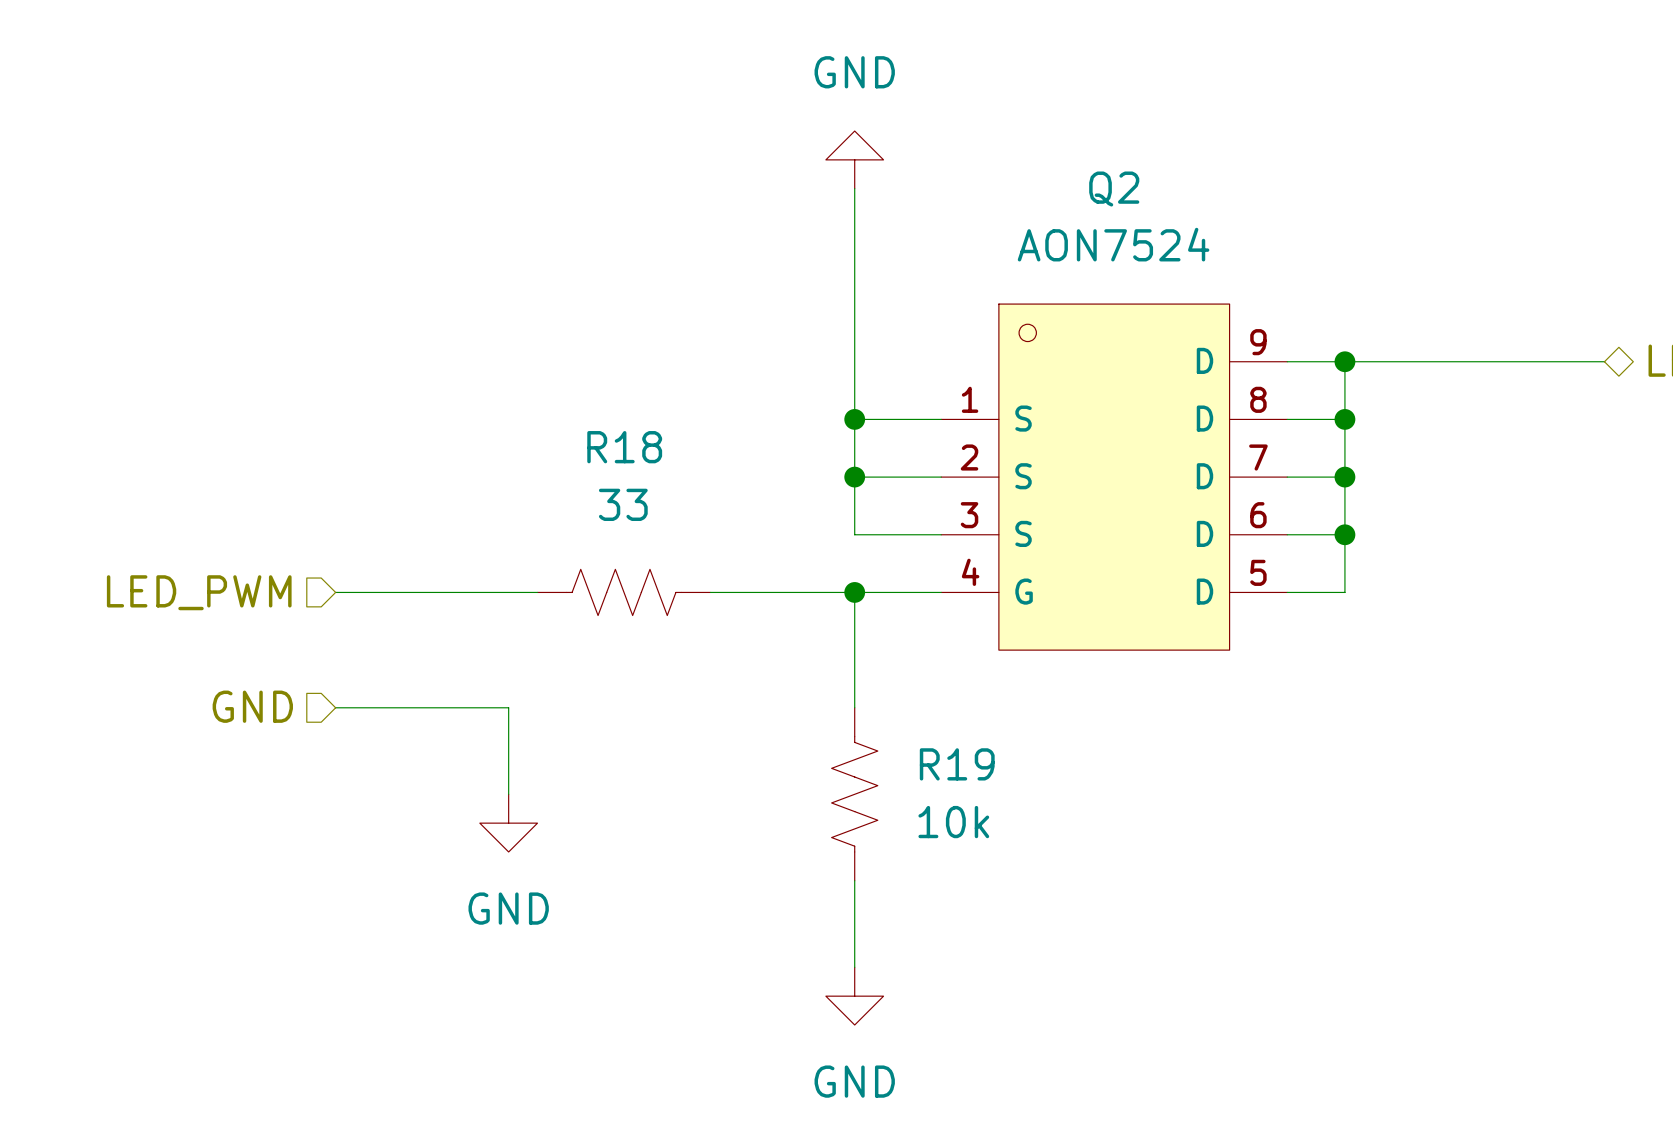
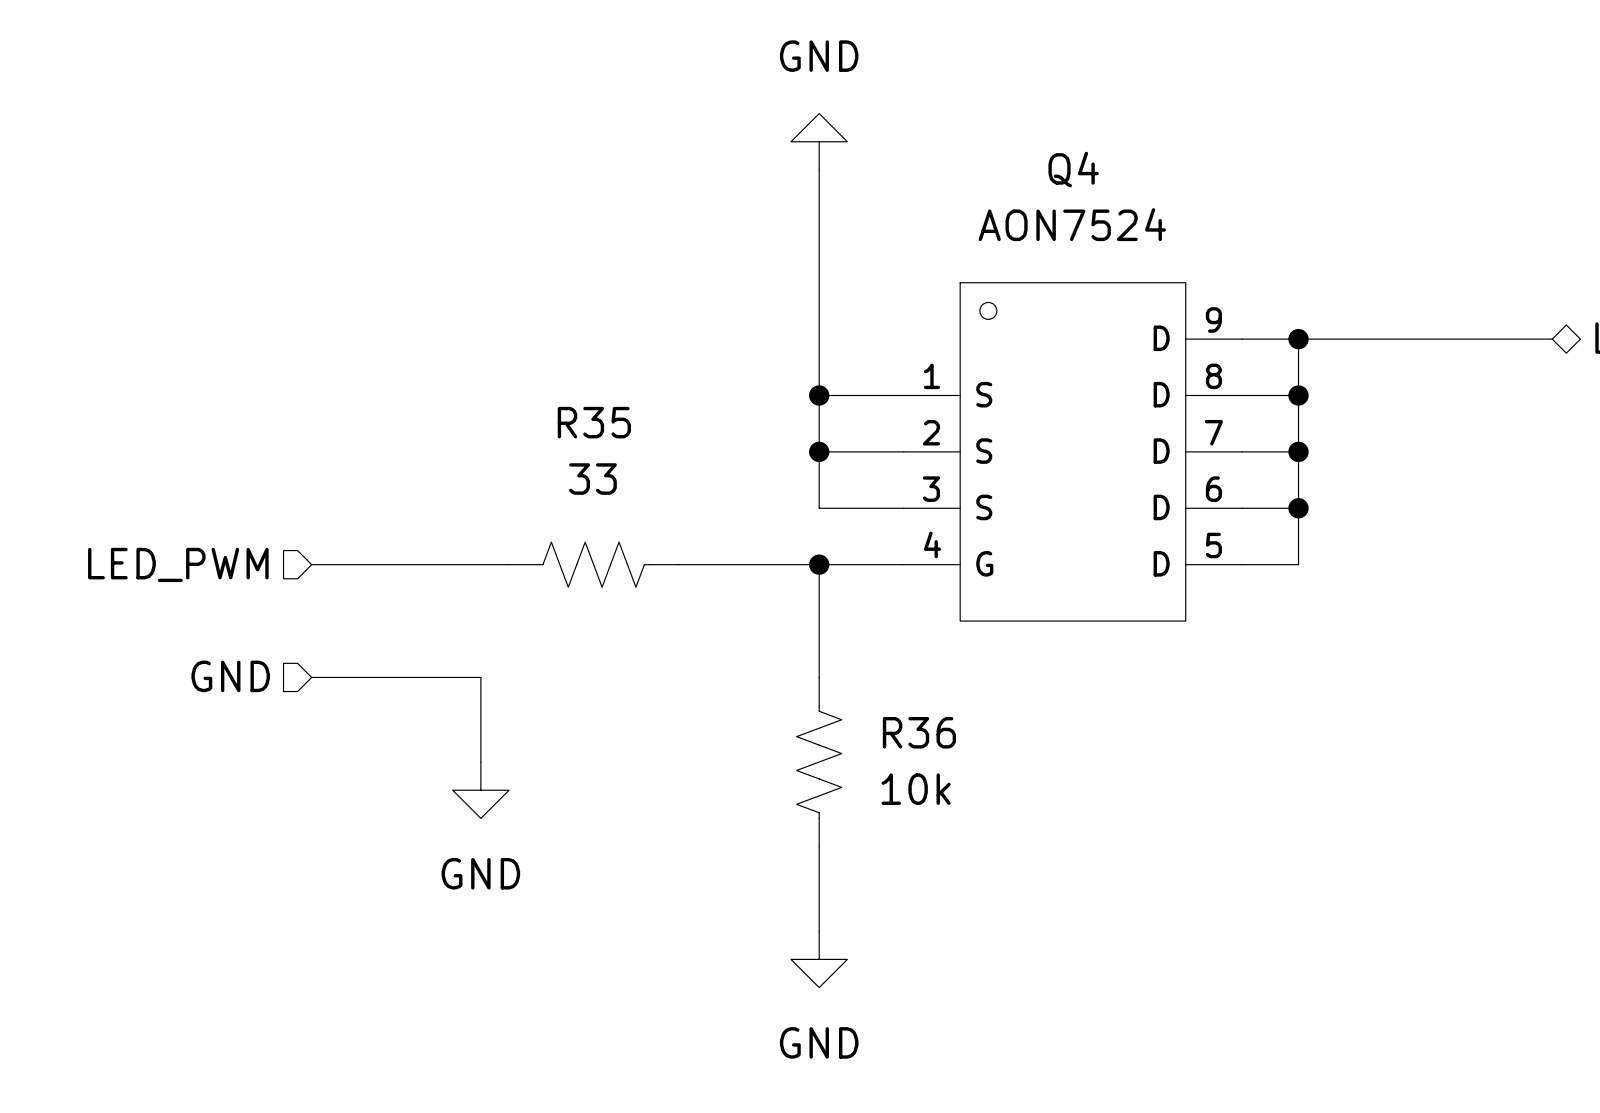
Q2 name: Q2 (1114, 189) -> Q4 (1073, 169)
R18 name: R18 (624, 447) -> R35 (594, 422)
R19 name: R19 (957, 764) -> R36 (919, 732)

